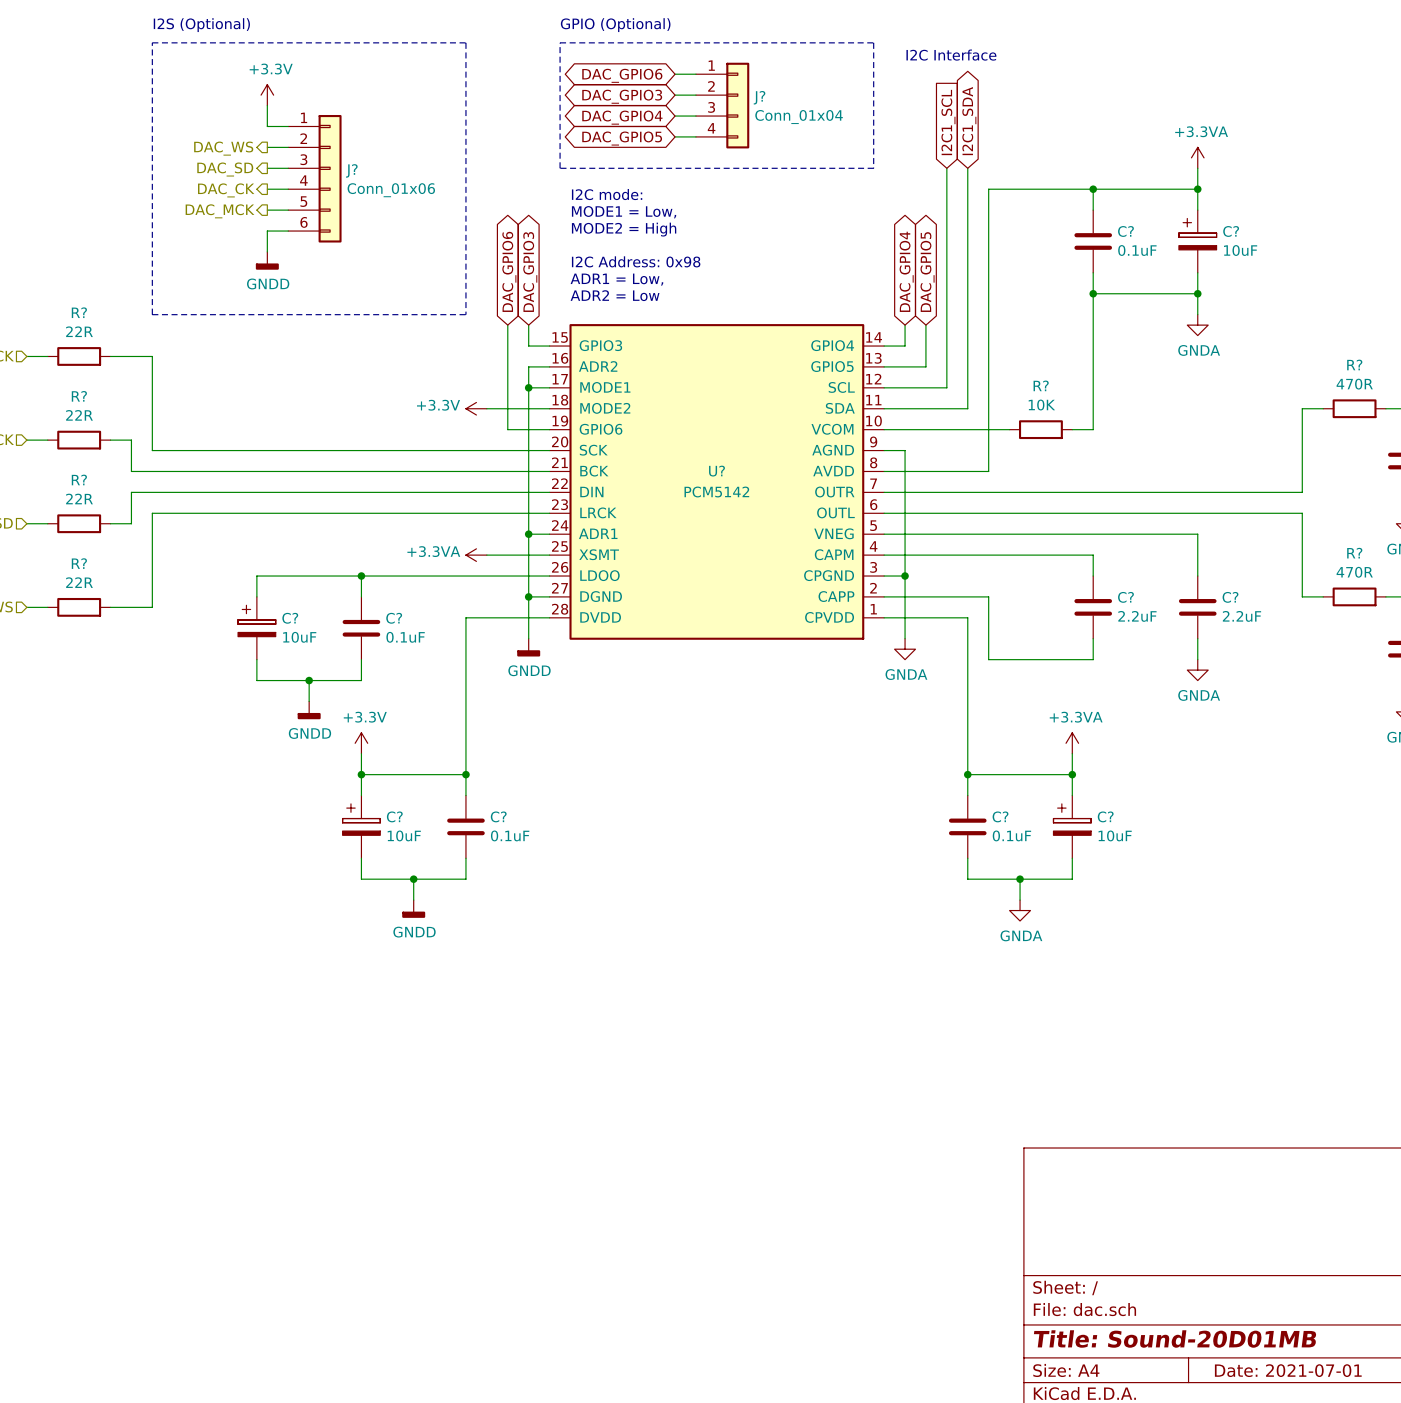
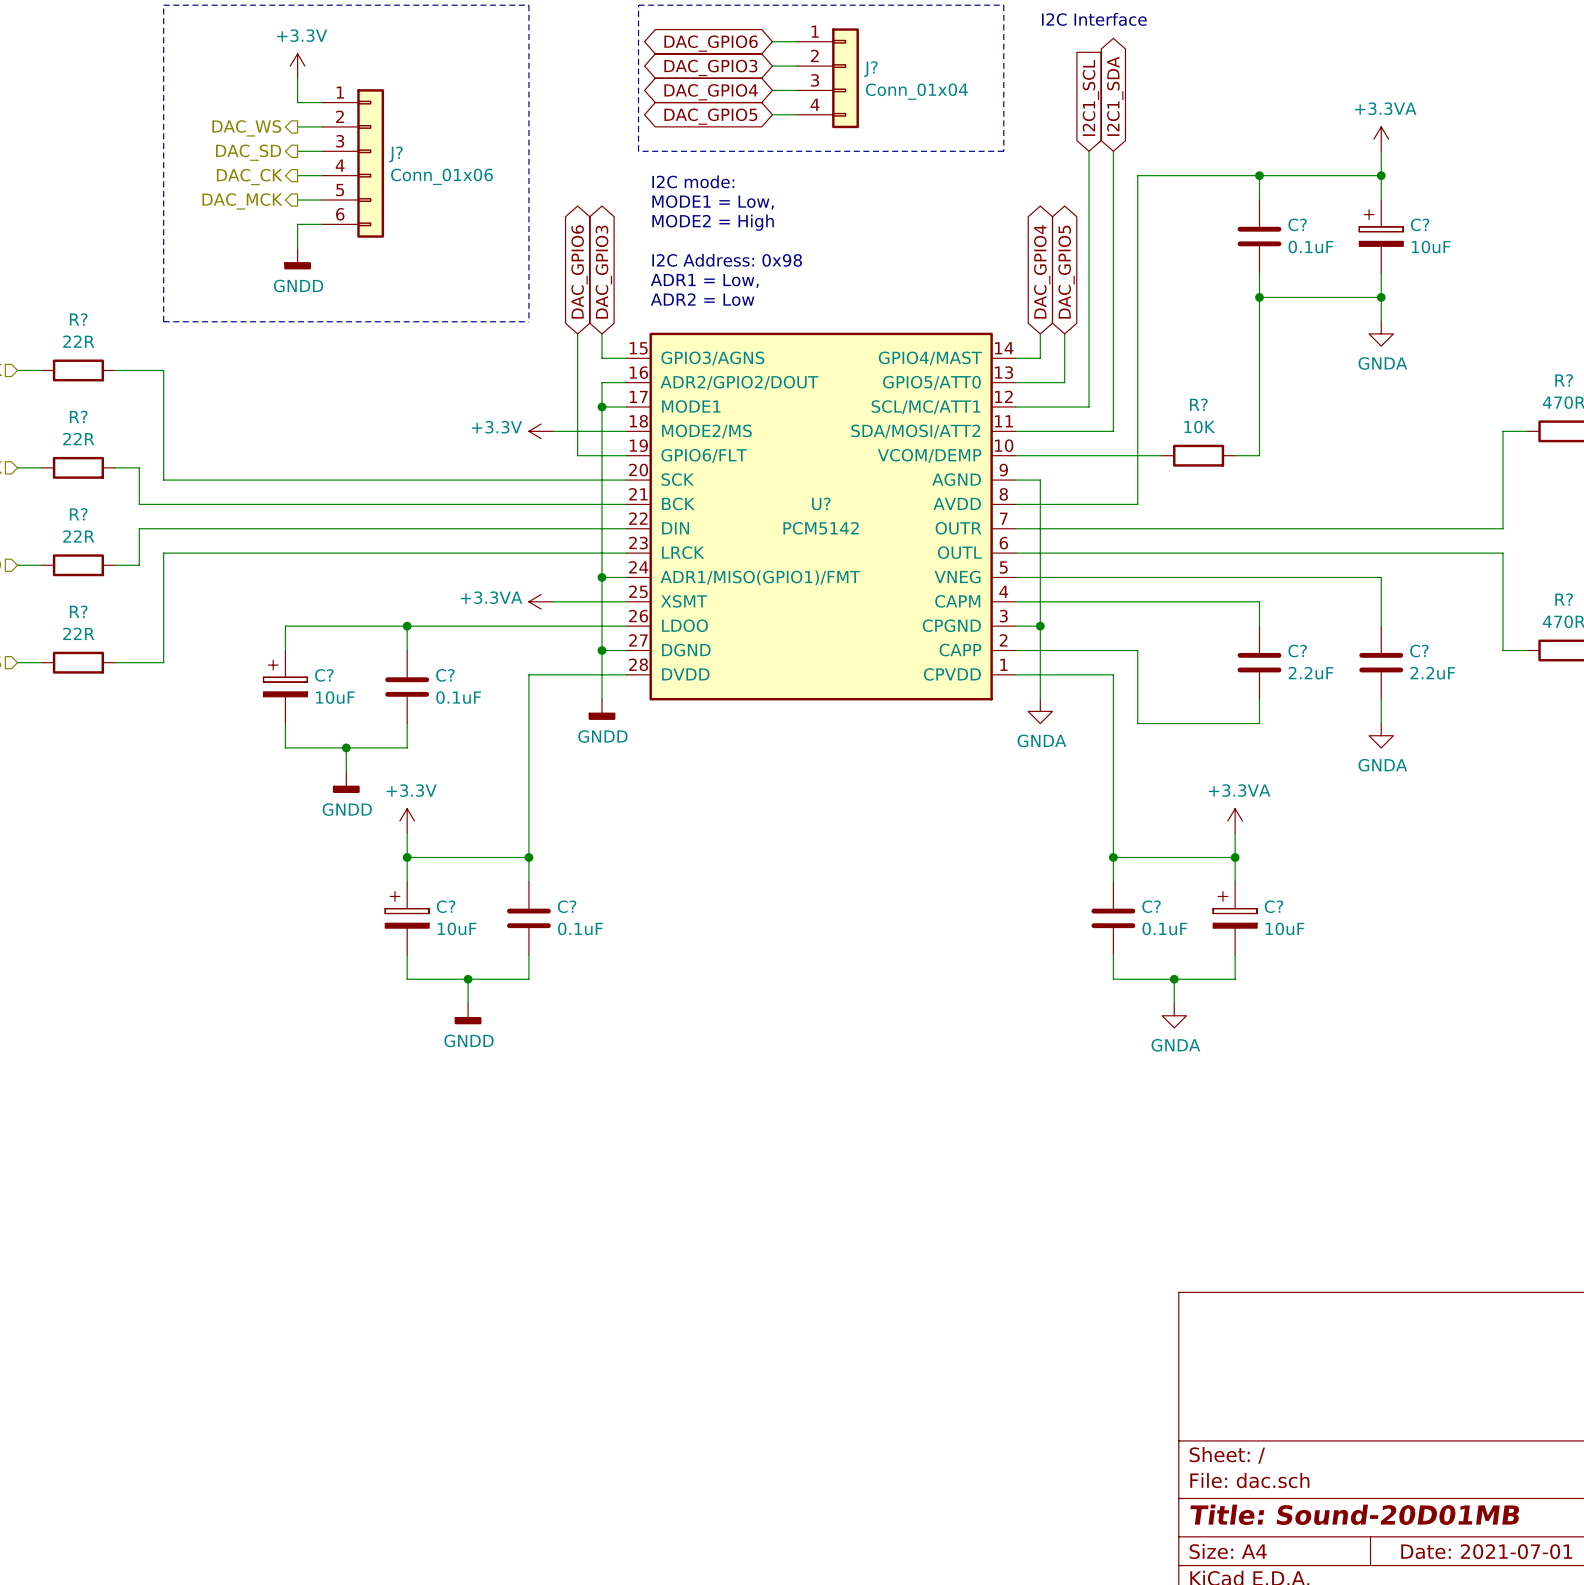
U? symbol: [549, 324, 885, 640] -> [626, 332, 1016, 701]

